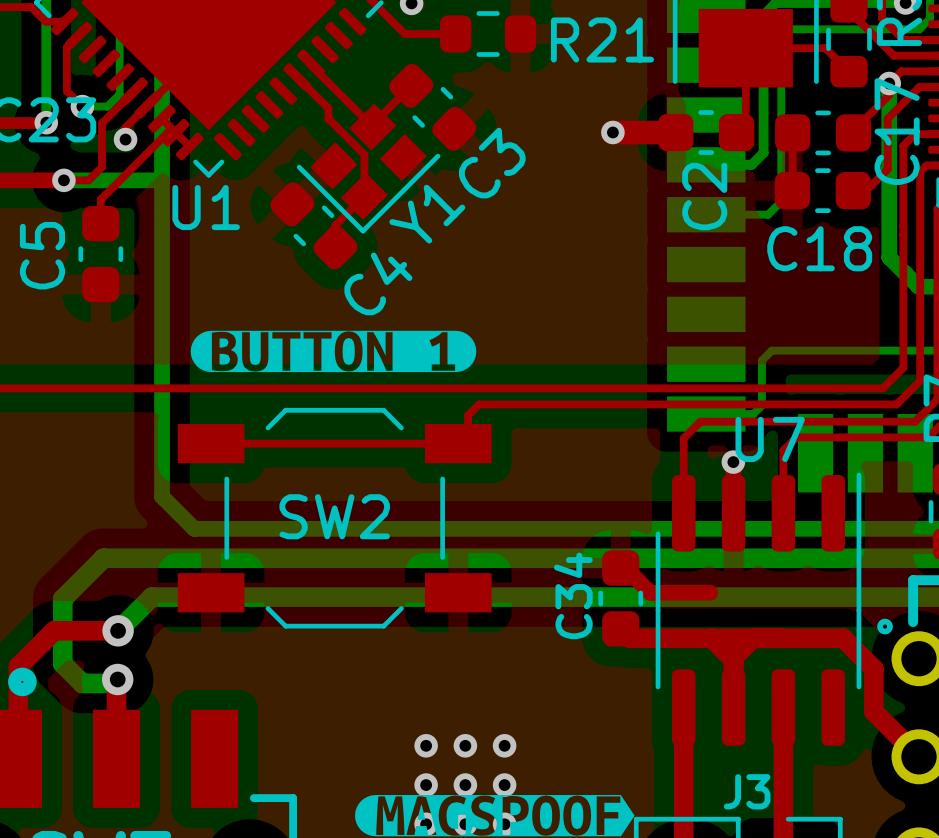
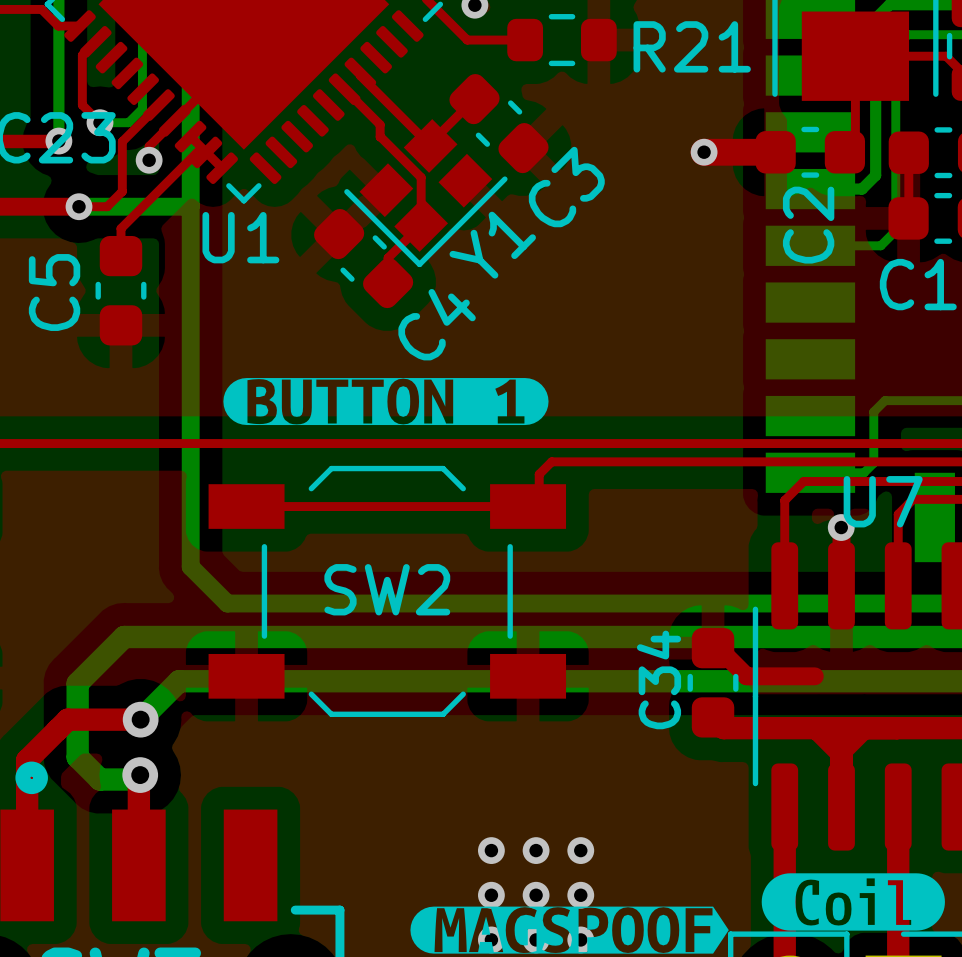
drawing: none -> [761, 873, 945, 931]
J3 name: J3 (747, 791) -> none

